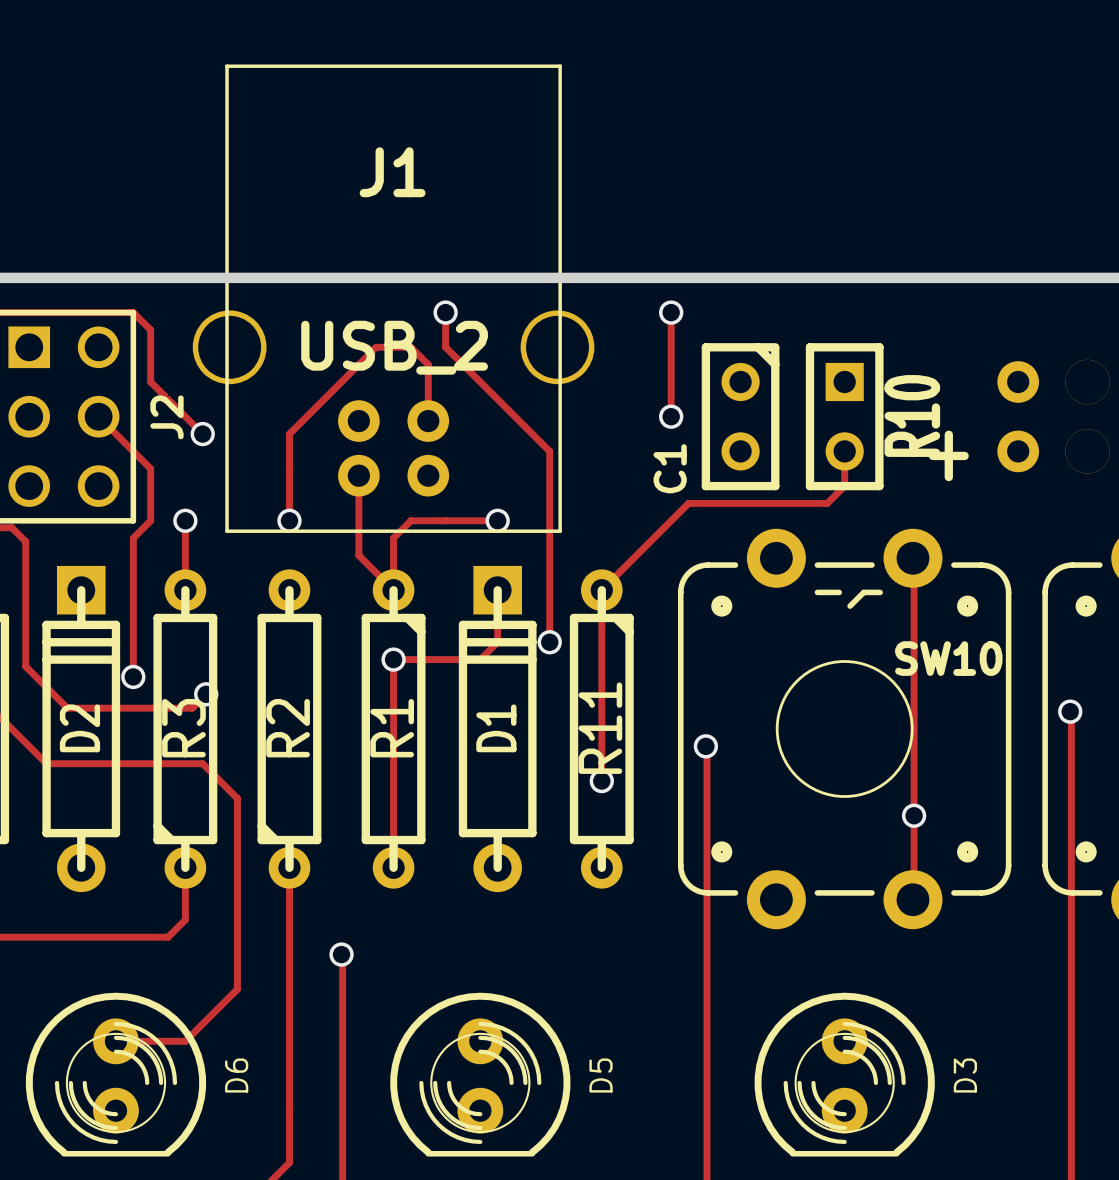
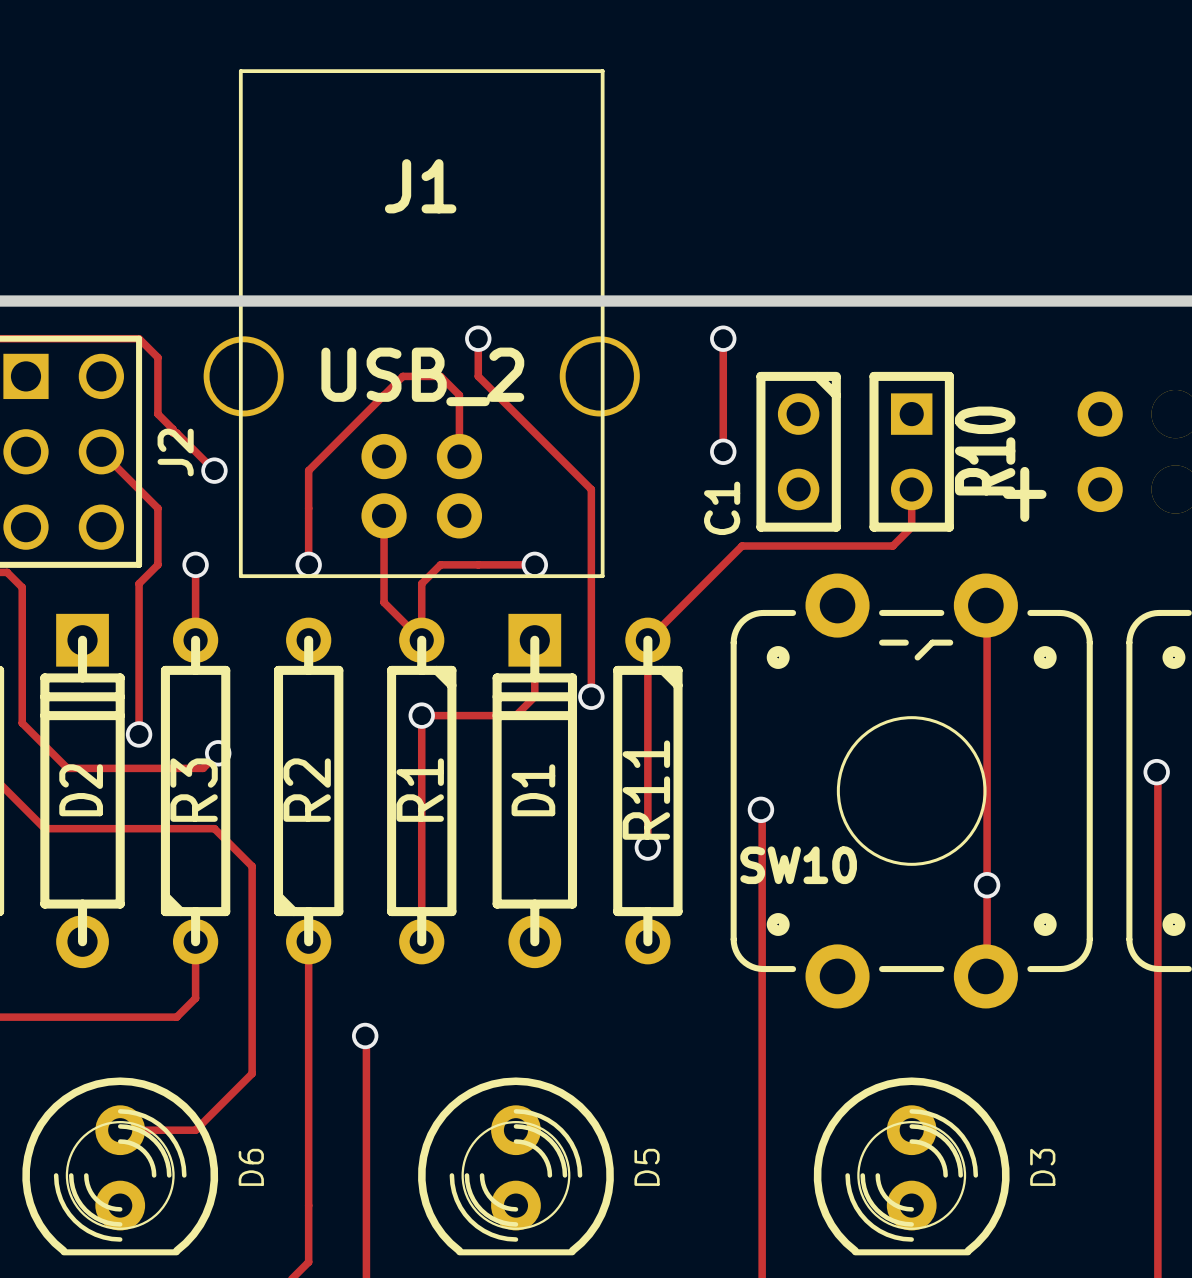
SW10 name position: SW10 (948, 658) -> SW10 (798, 865)

